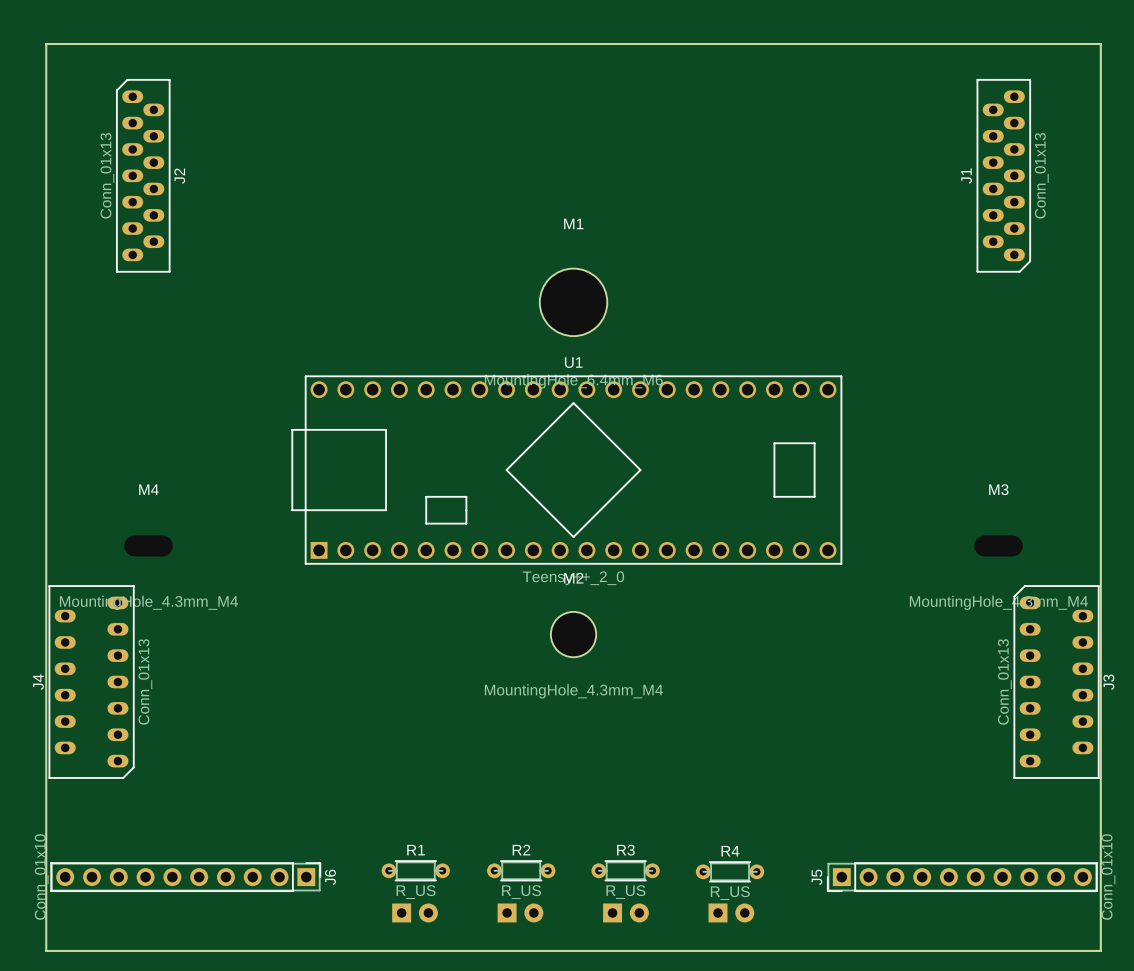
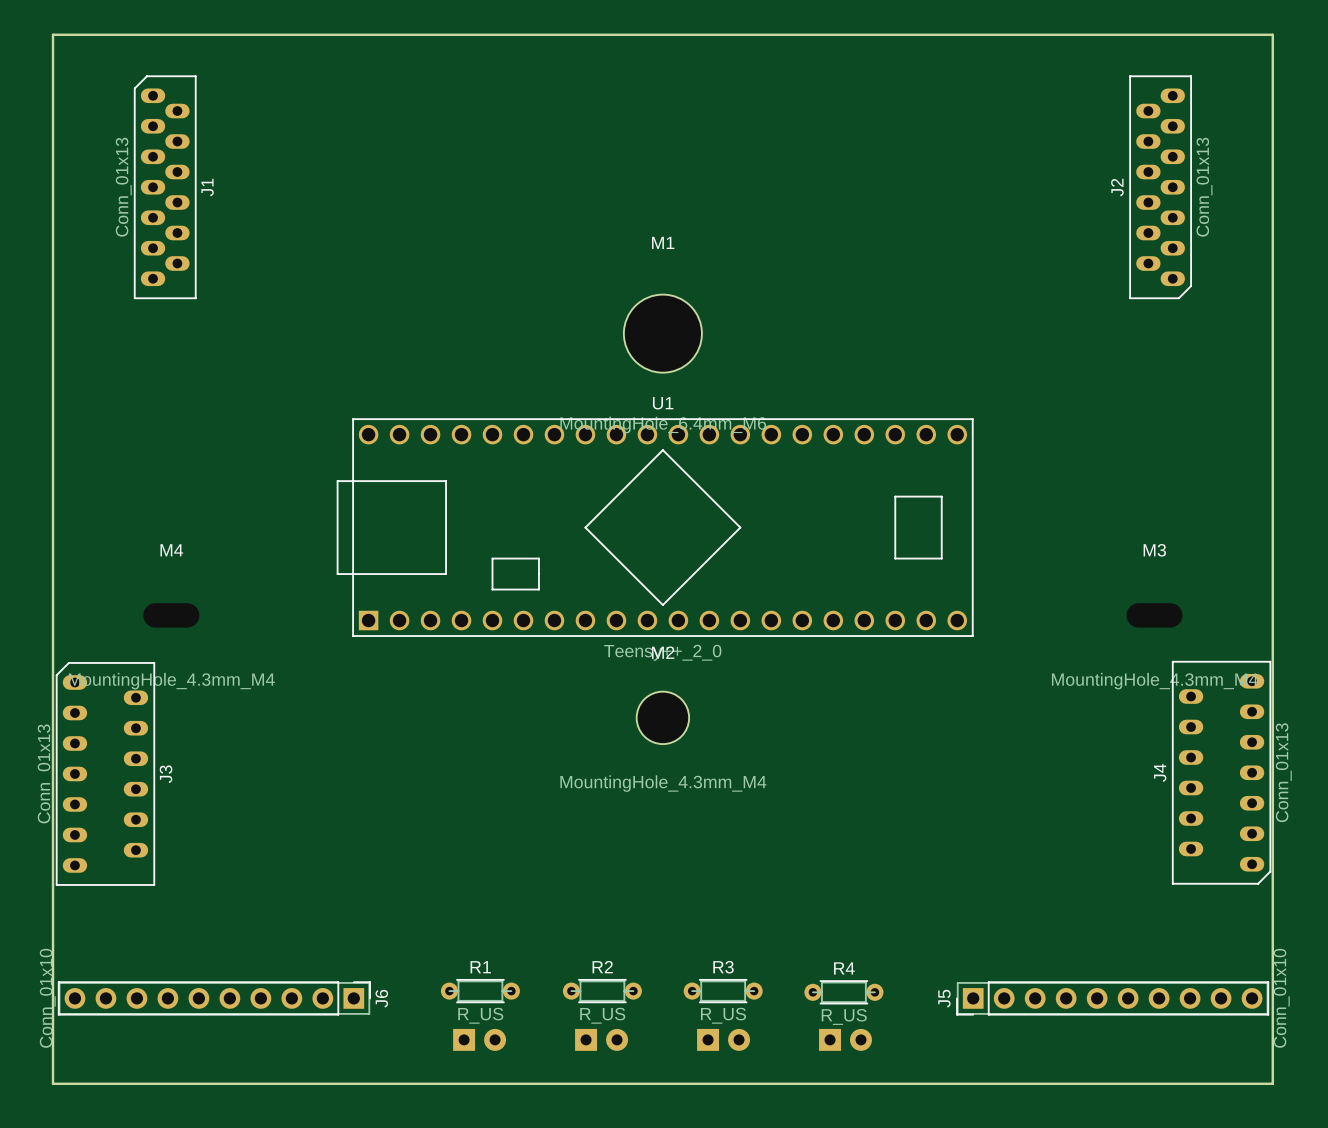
J2 name: J2 (179, 176) -> J1 (207, 187)
J1 name: J1 (966, 176) -> J2 (1117, 187)
J4 position: (91, 682) -> (1221, 772)
J3 position: (1056, 682) -> (105, 773)

